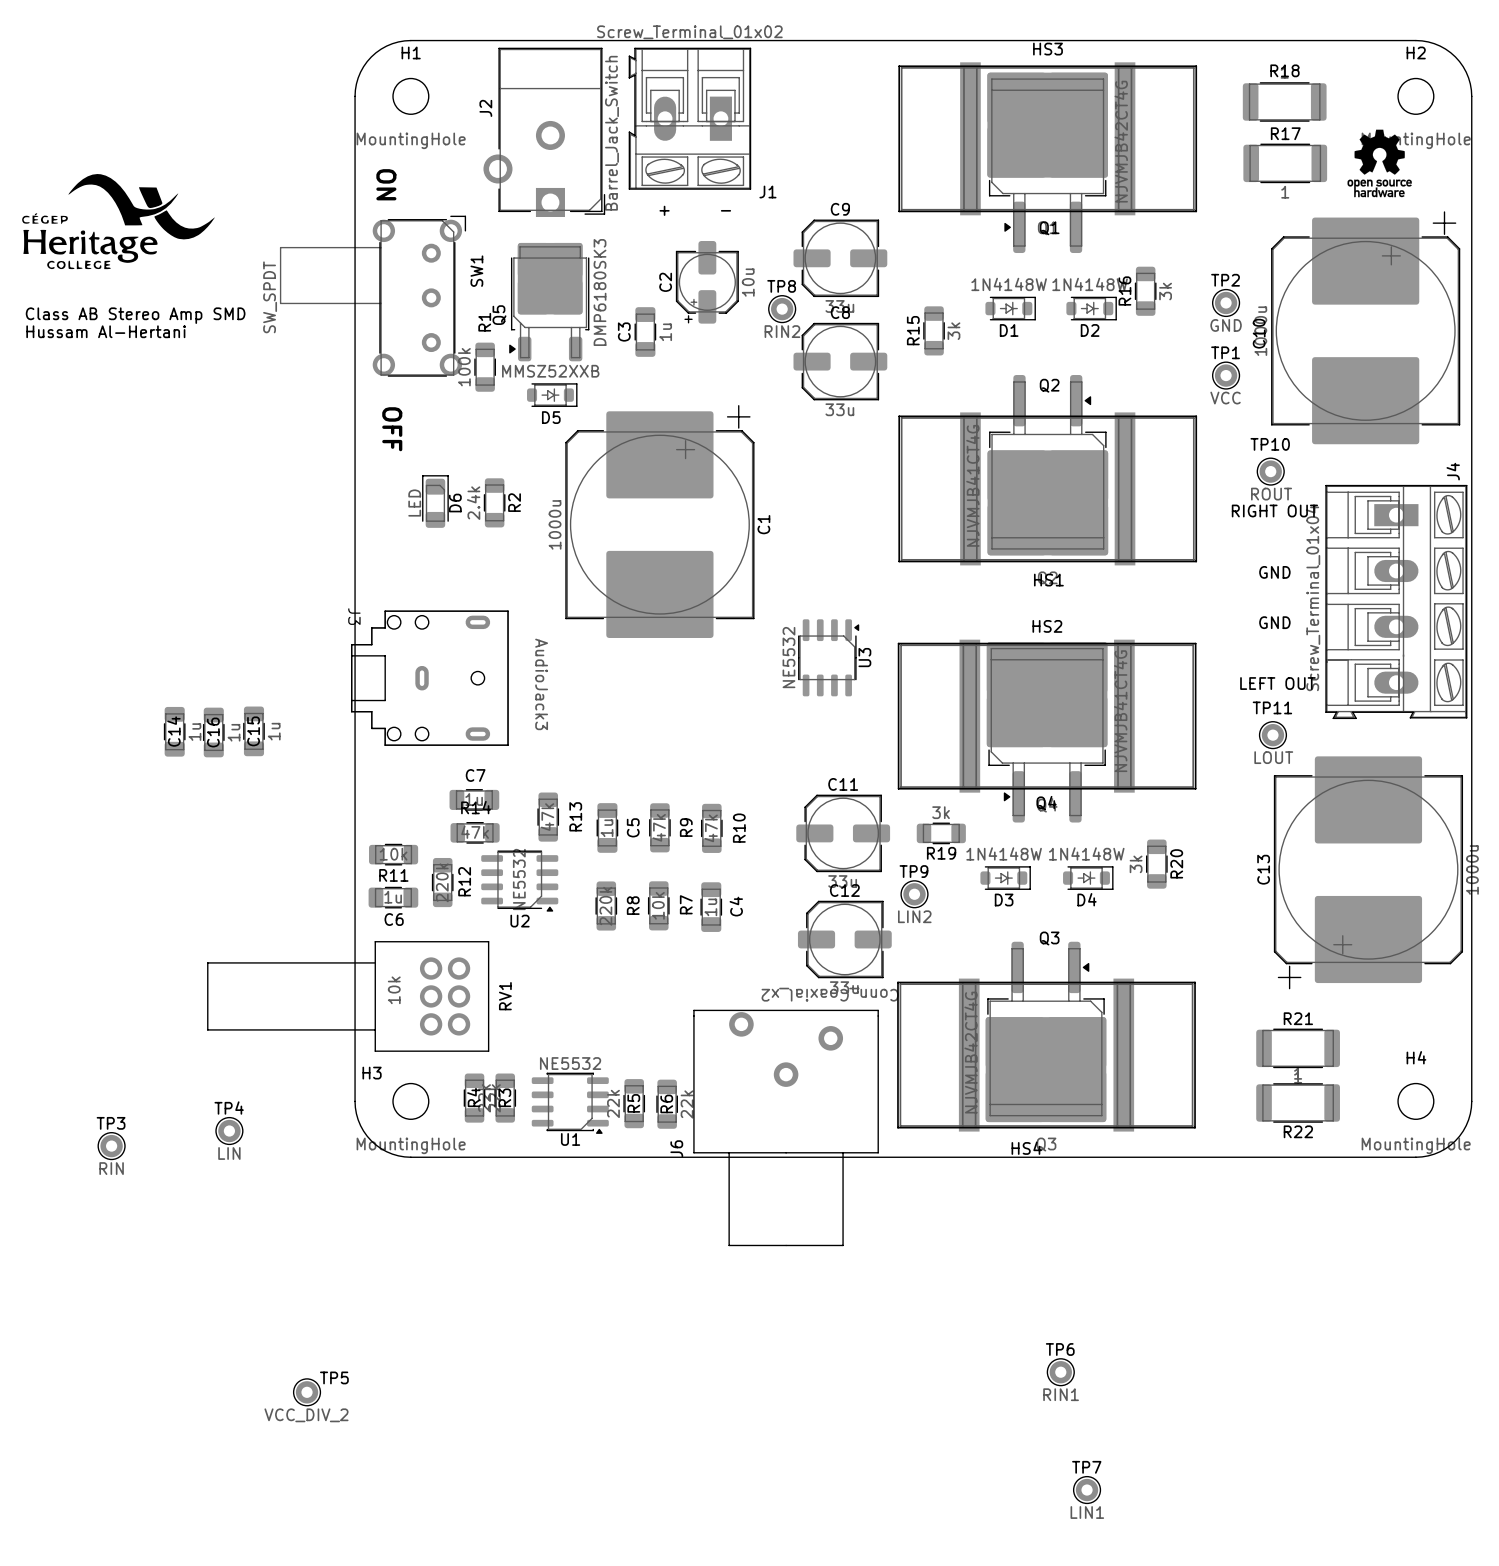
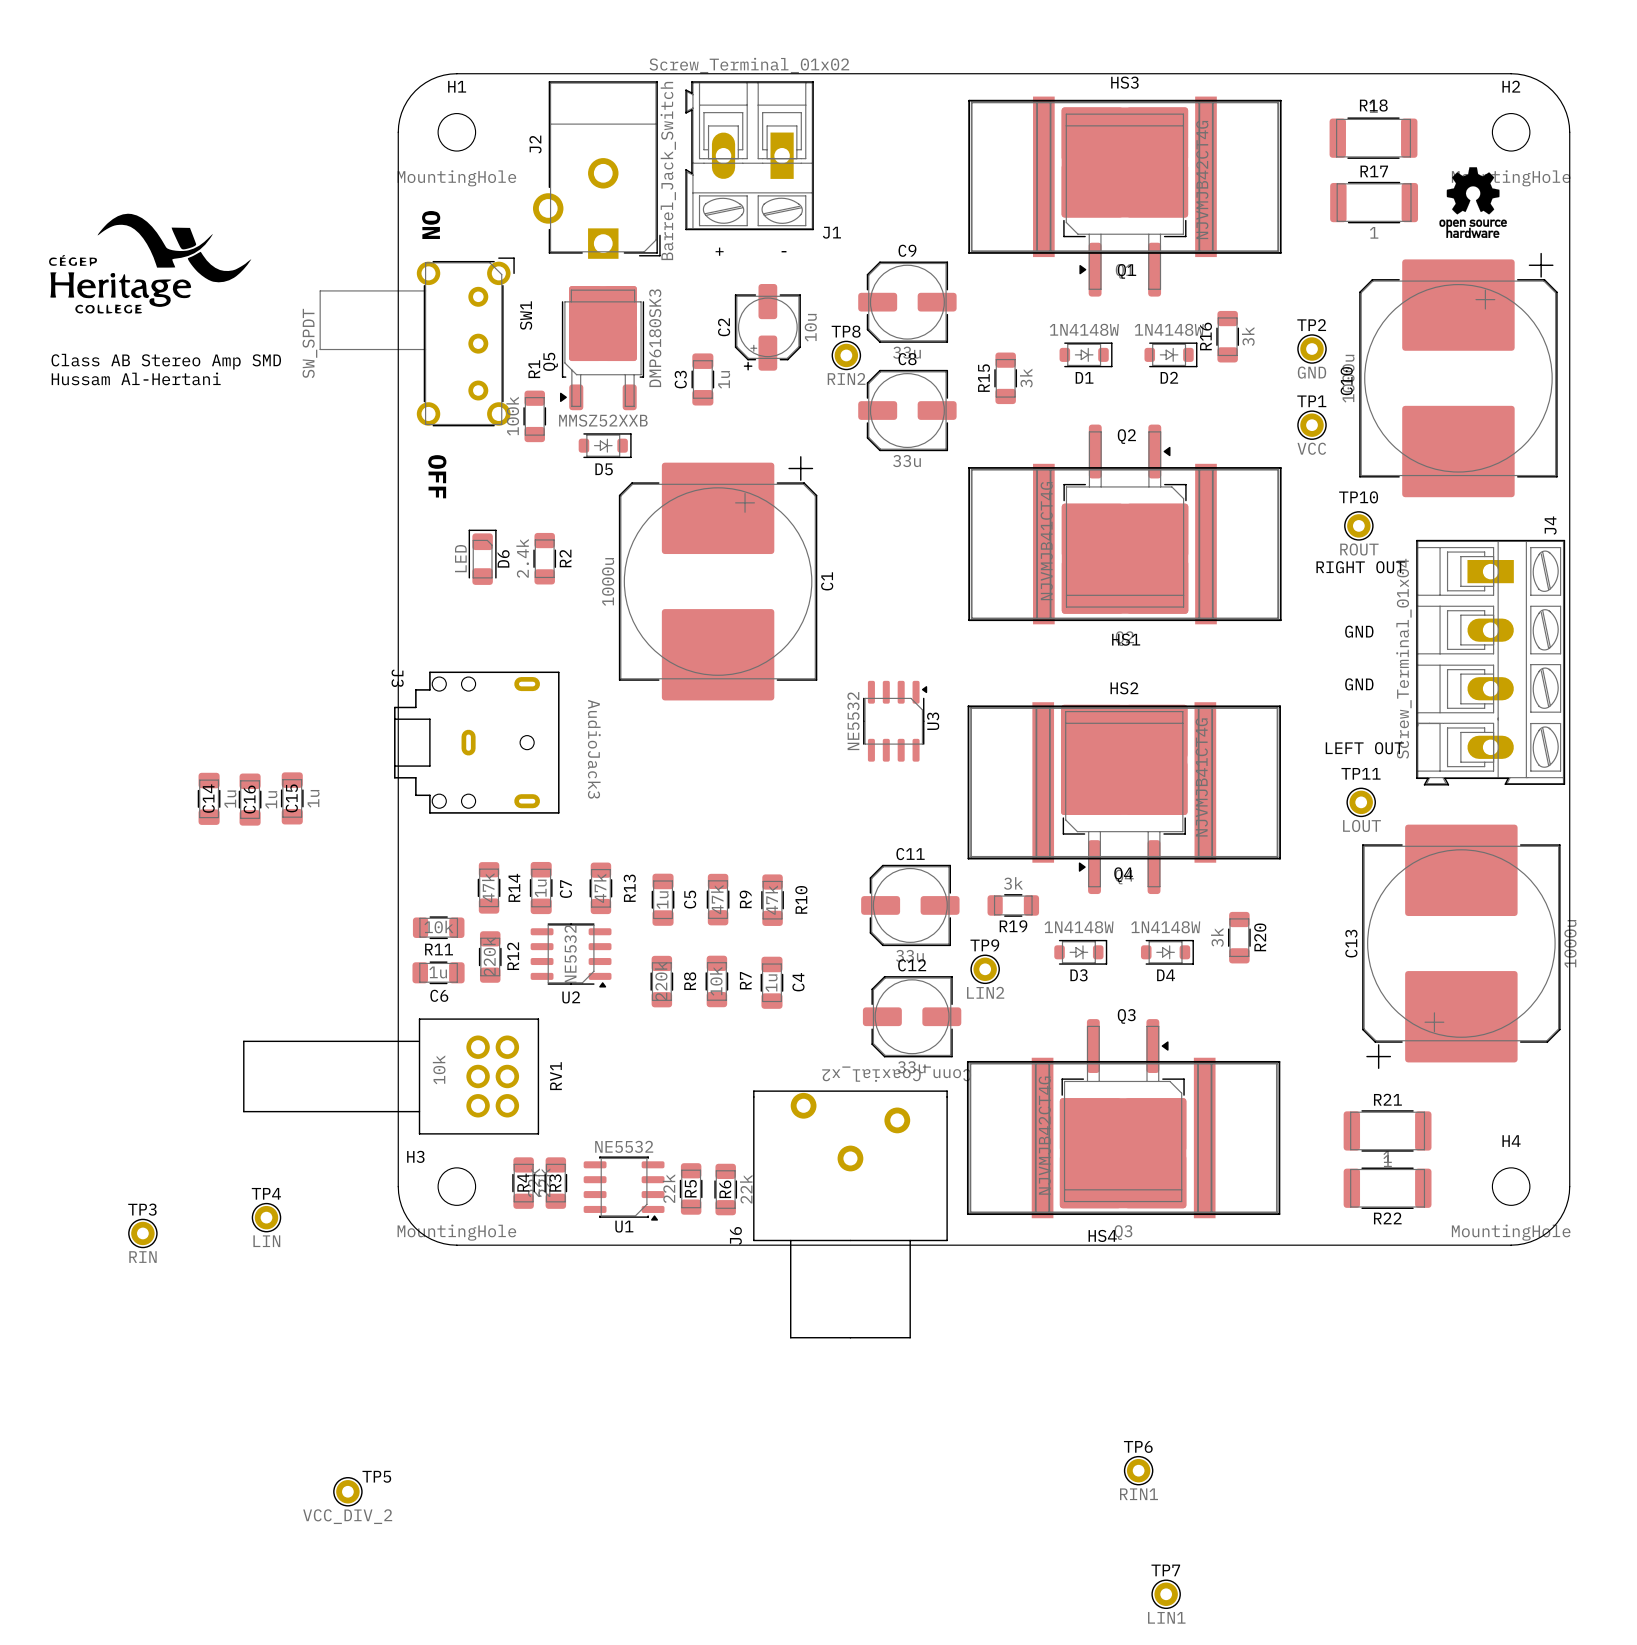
C7 rotation: 0° (474, 799) -> 90° clockwise (541, 888)
R14 rotation: 0° (475, 832) -> 90° clockwise (489, 887)
R14 position: (475, 832) -> (489, 887)

